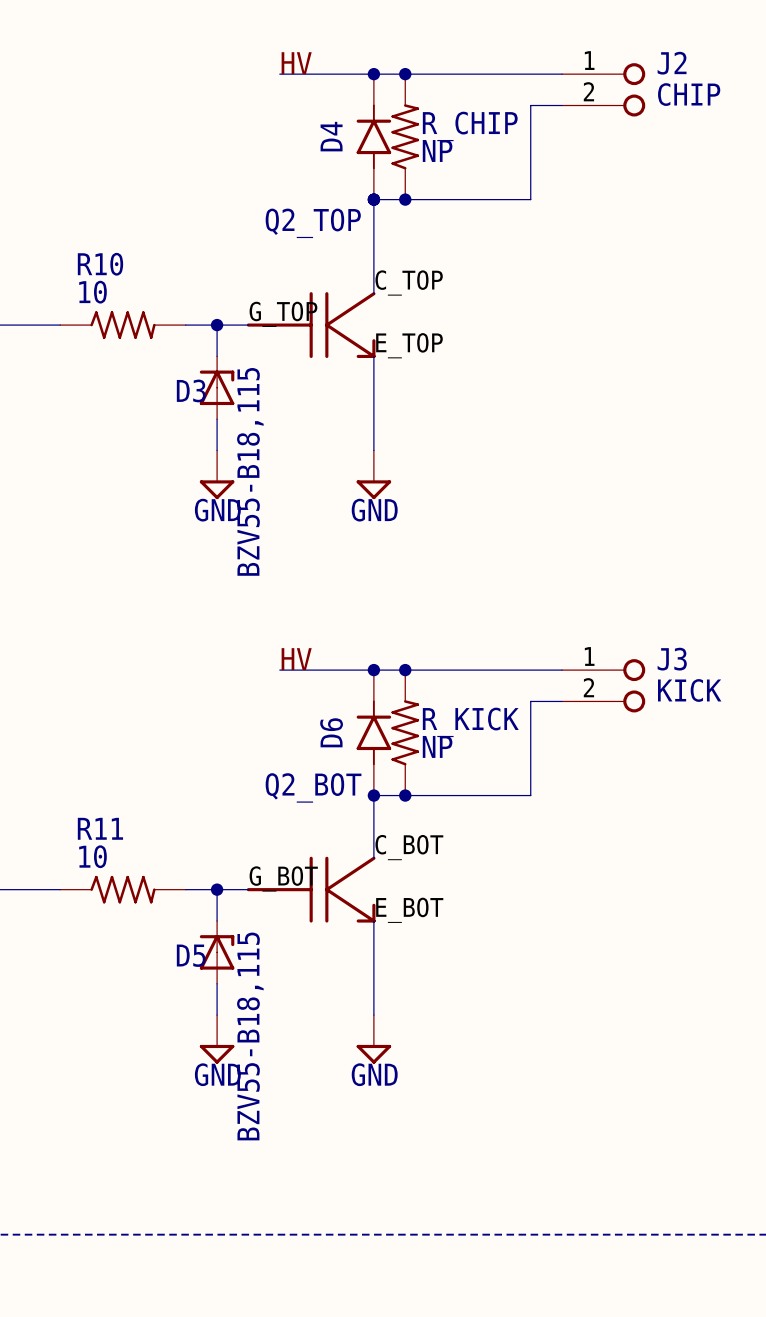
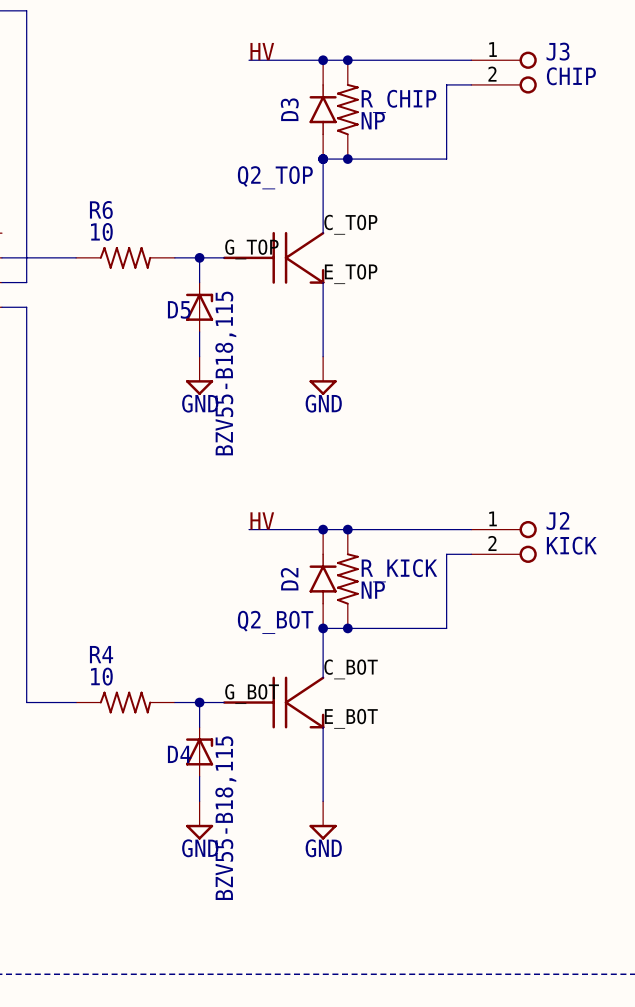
J2 name: J2 (672, 63) -> J3 (558, 51)
D4 name: D4 (331, 136) -> D3 (289, 109)
R10 name: R10 (100, 264) -> R6 (101, 209)
D3 name: D3 (191, 390) -> D5 (179, 309)
J3 name: J3 (672, 659) -> J2 (557, 520)
D6 name: D6 (331, 732) -> D2 (289, 579)
R11 name: R11 (100, 828) -> R4 (101, 654)
D5 name: D5 (191, 955) -> D4 (179, 754)

